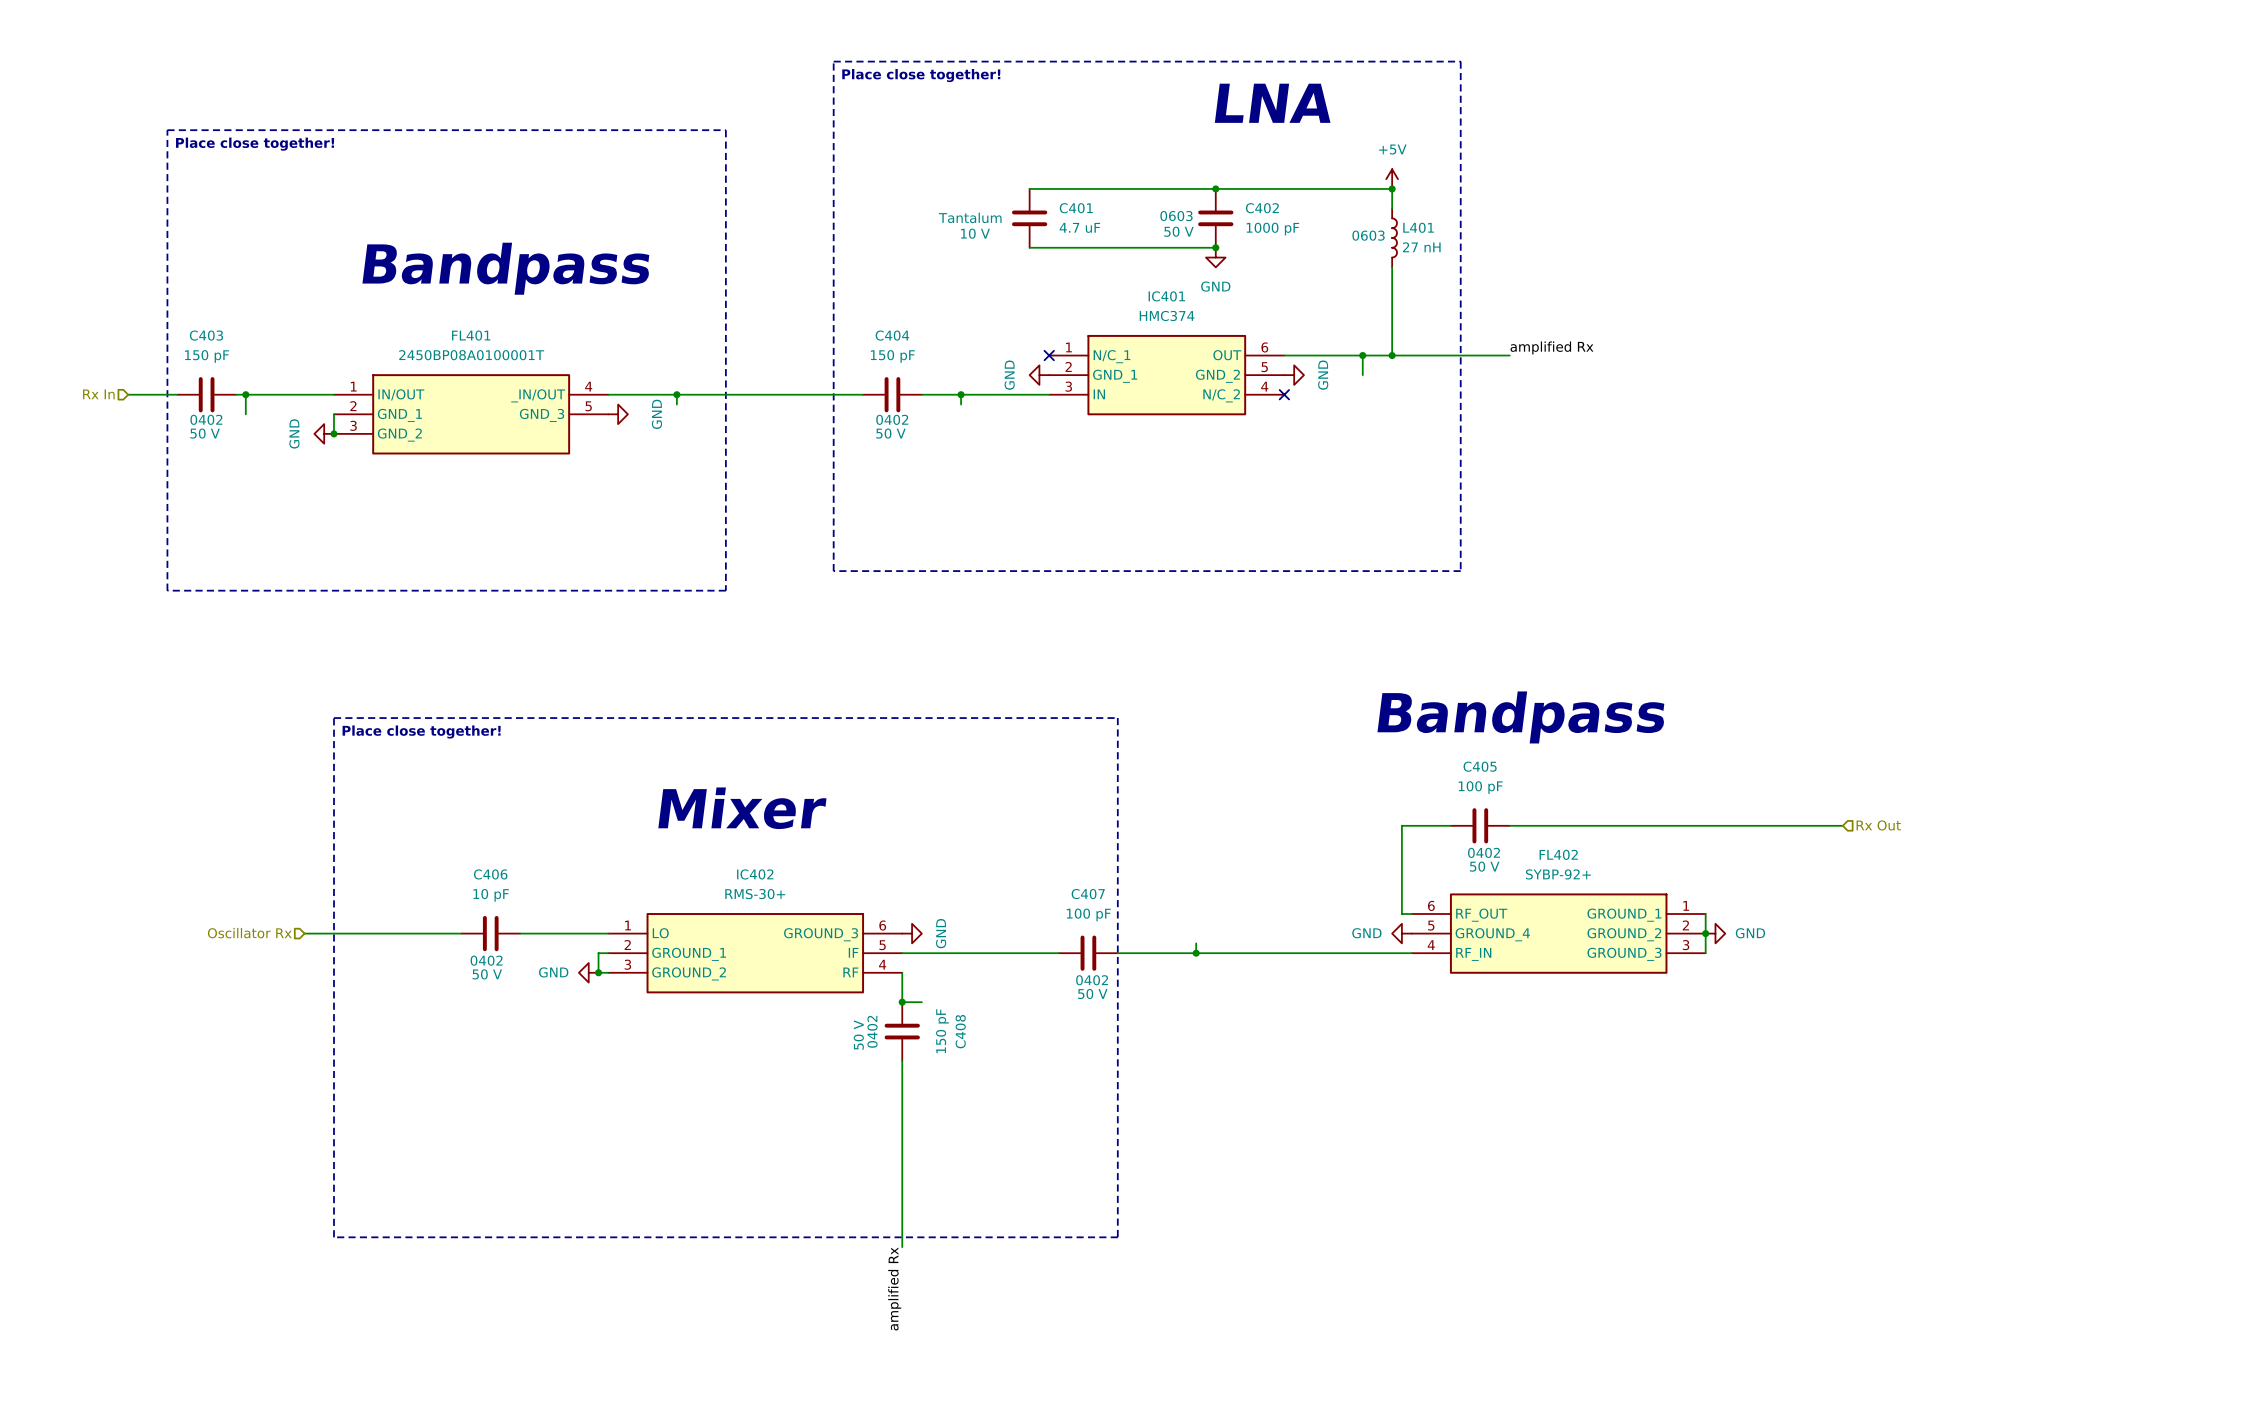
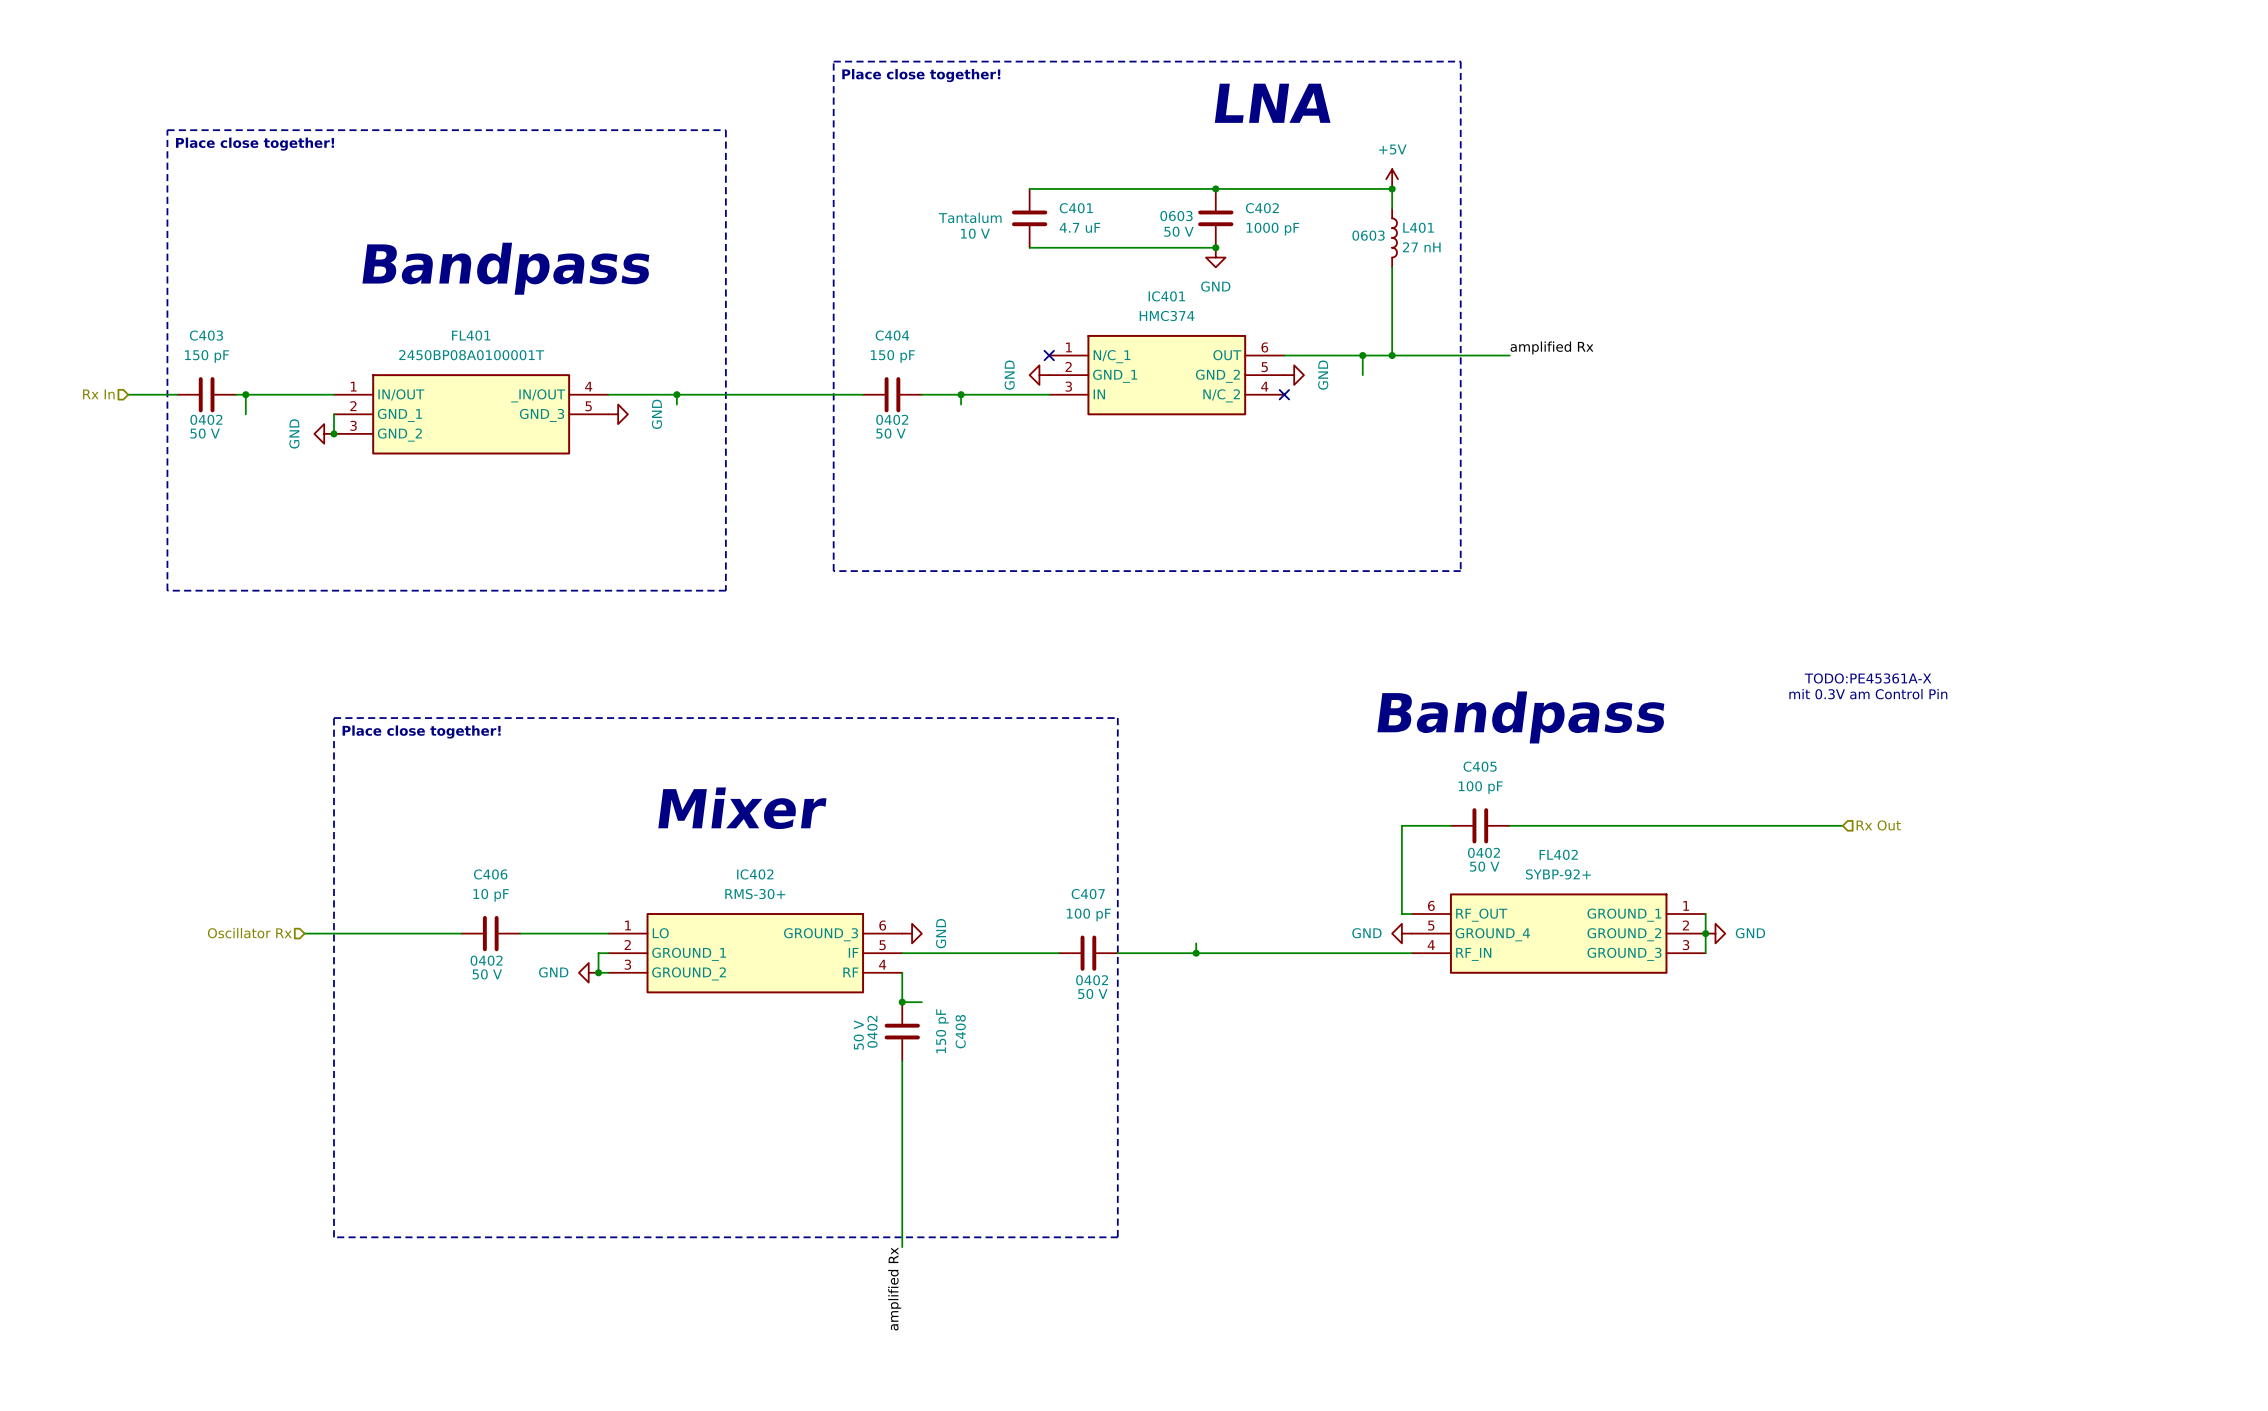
text: none -> TODO:PE45361A-X (1868, 678)
text: none -> mit 0.3V am Control Pin (1868, 694)

